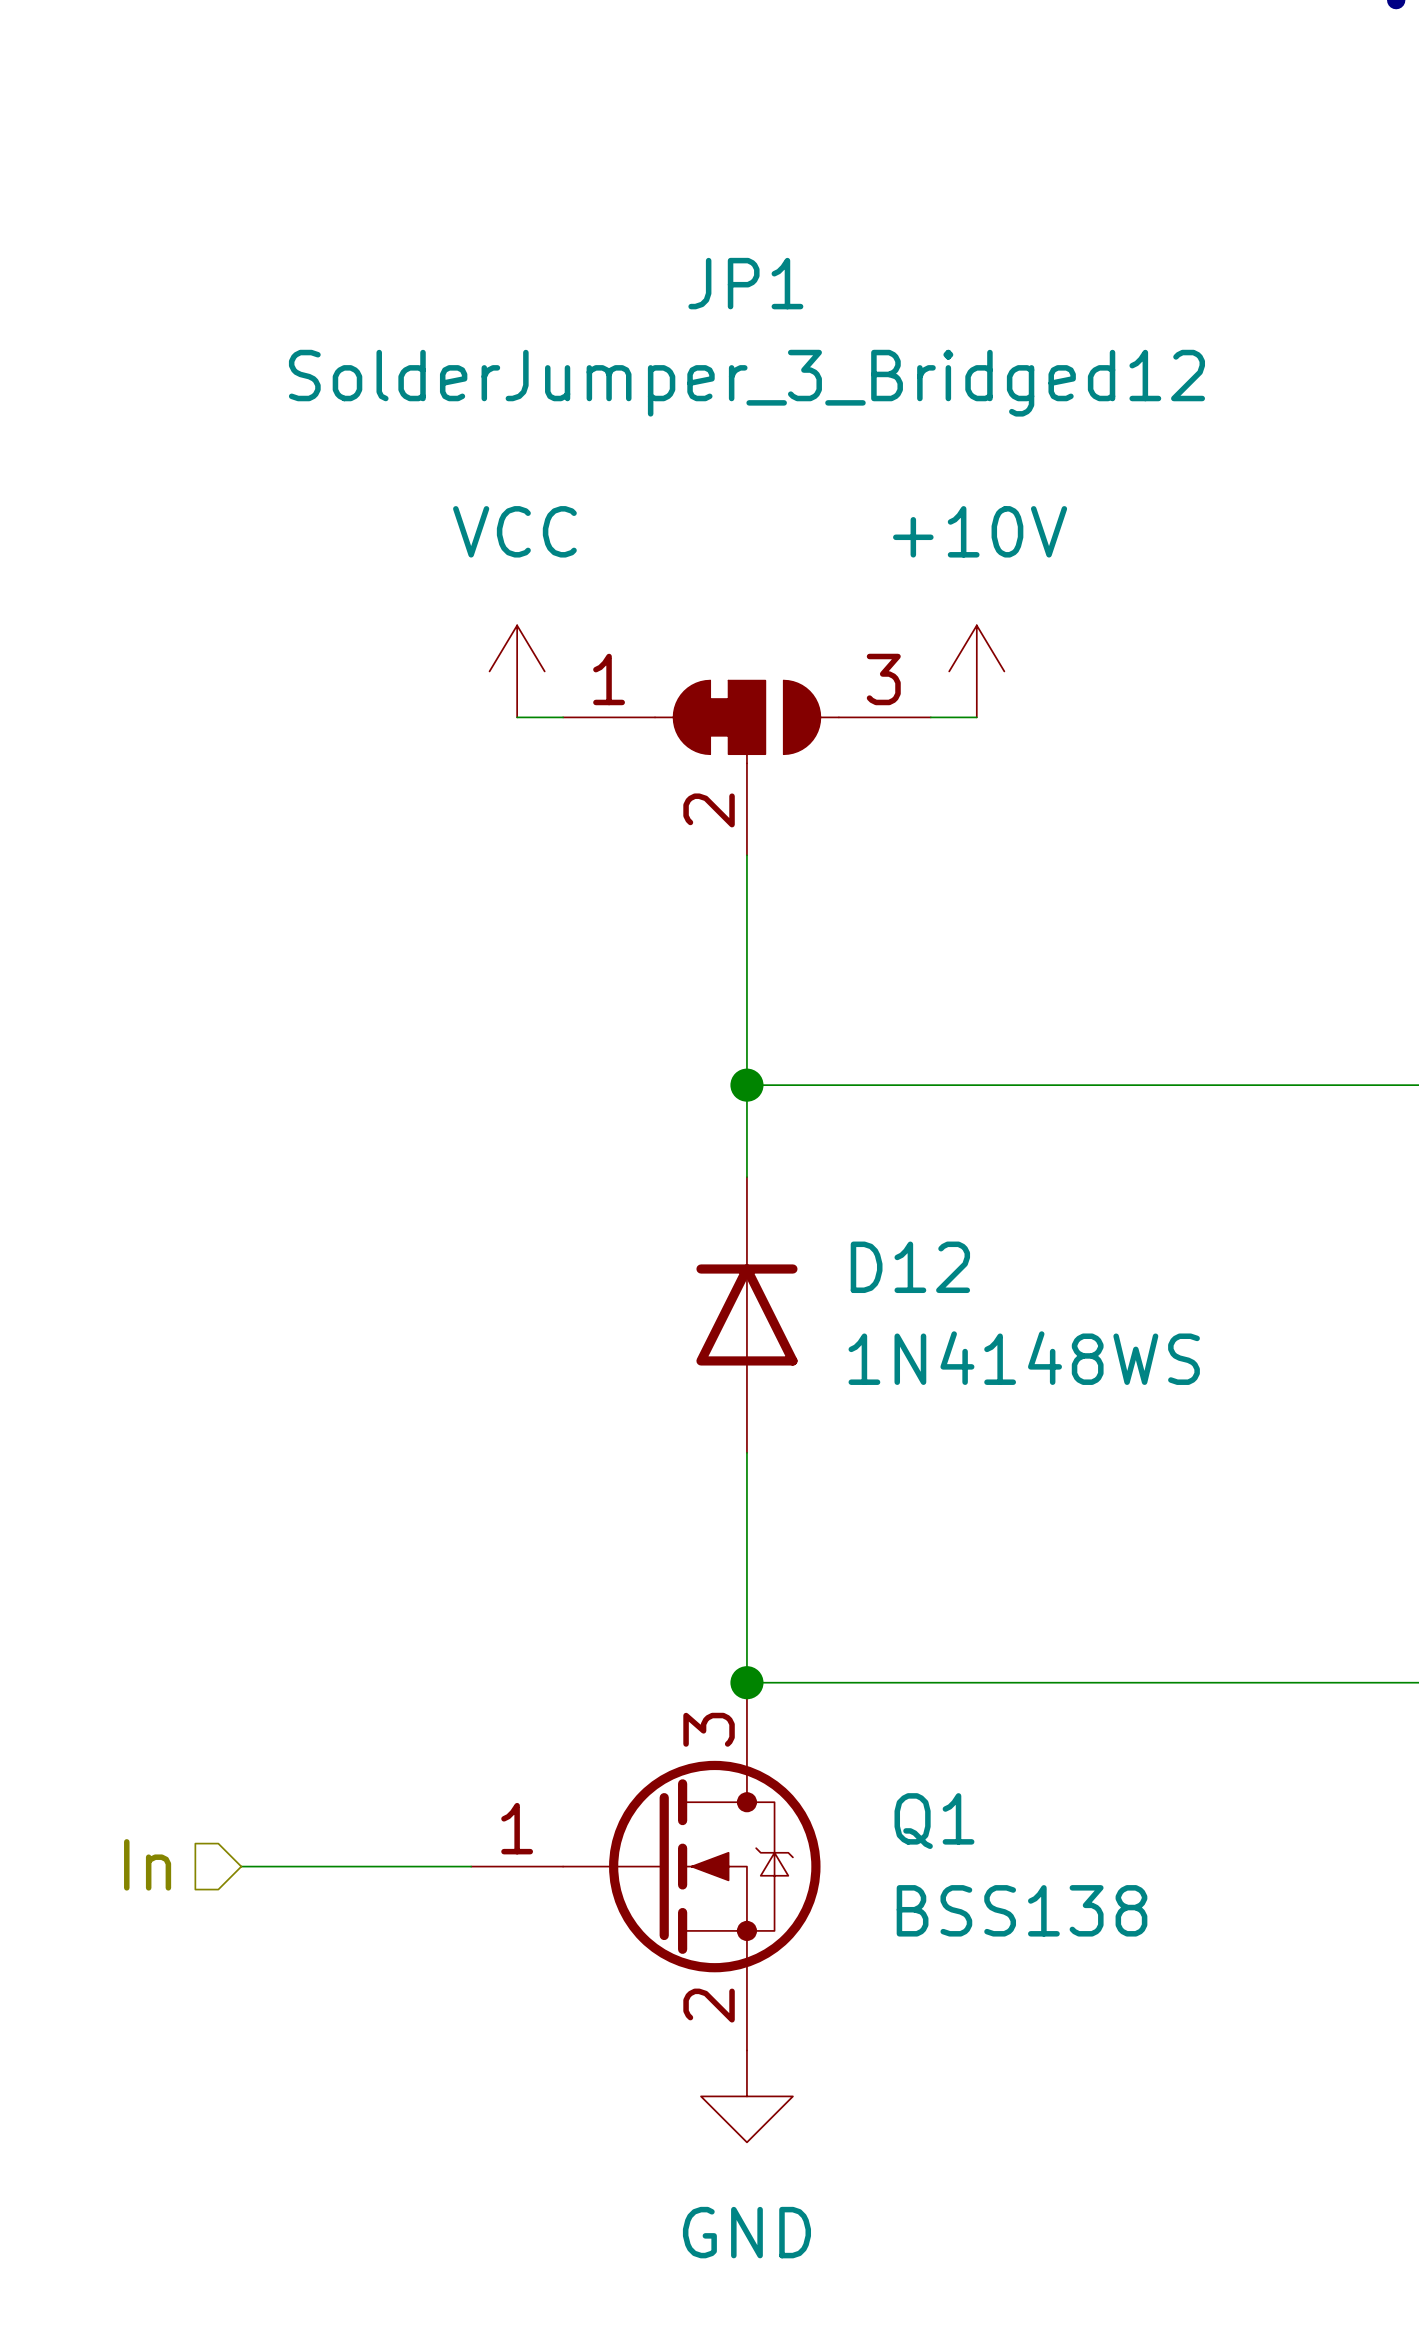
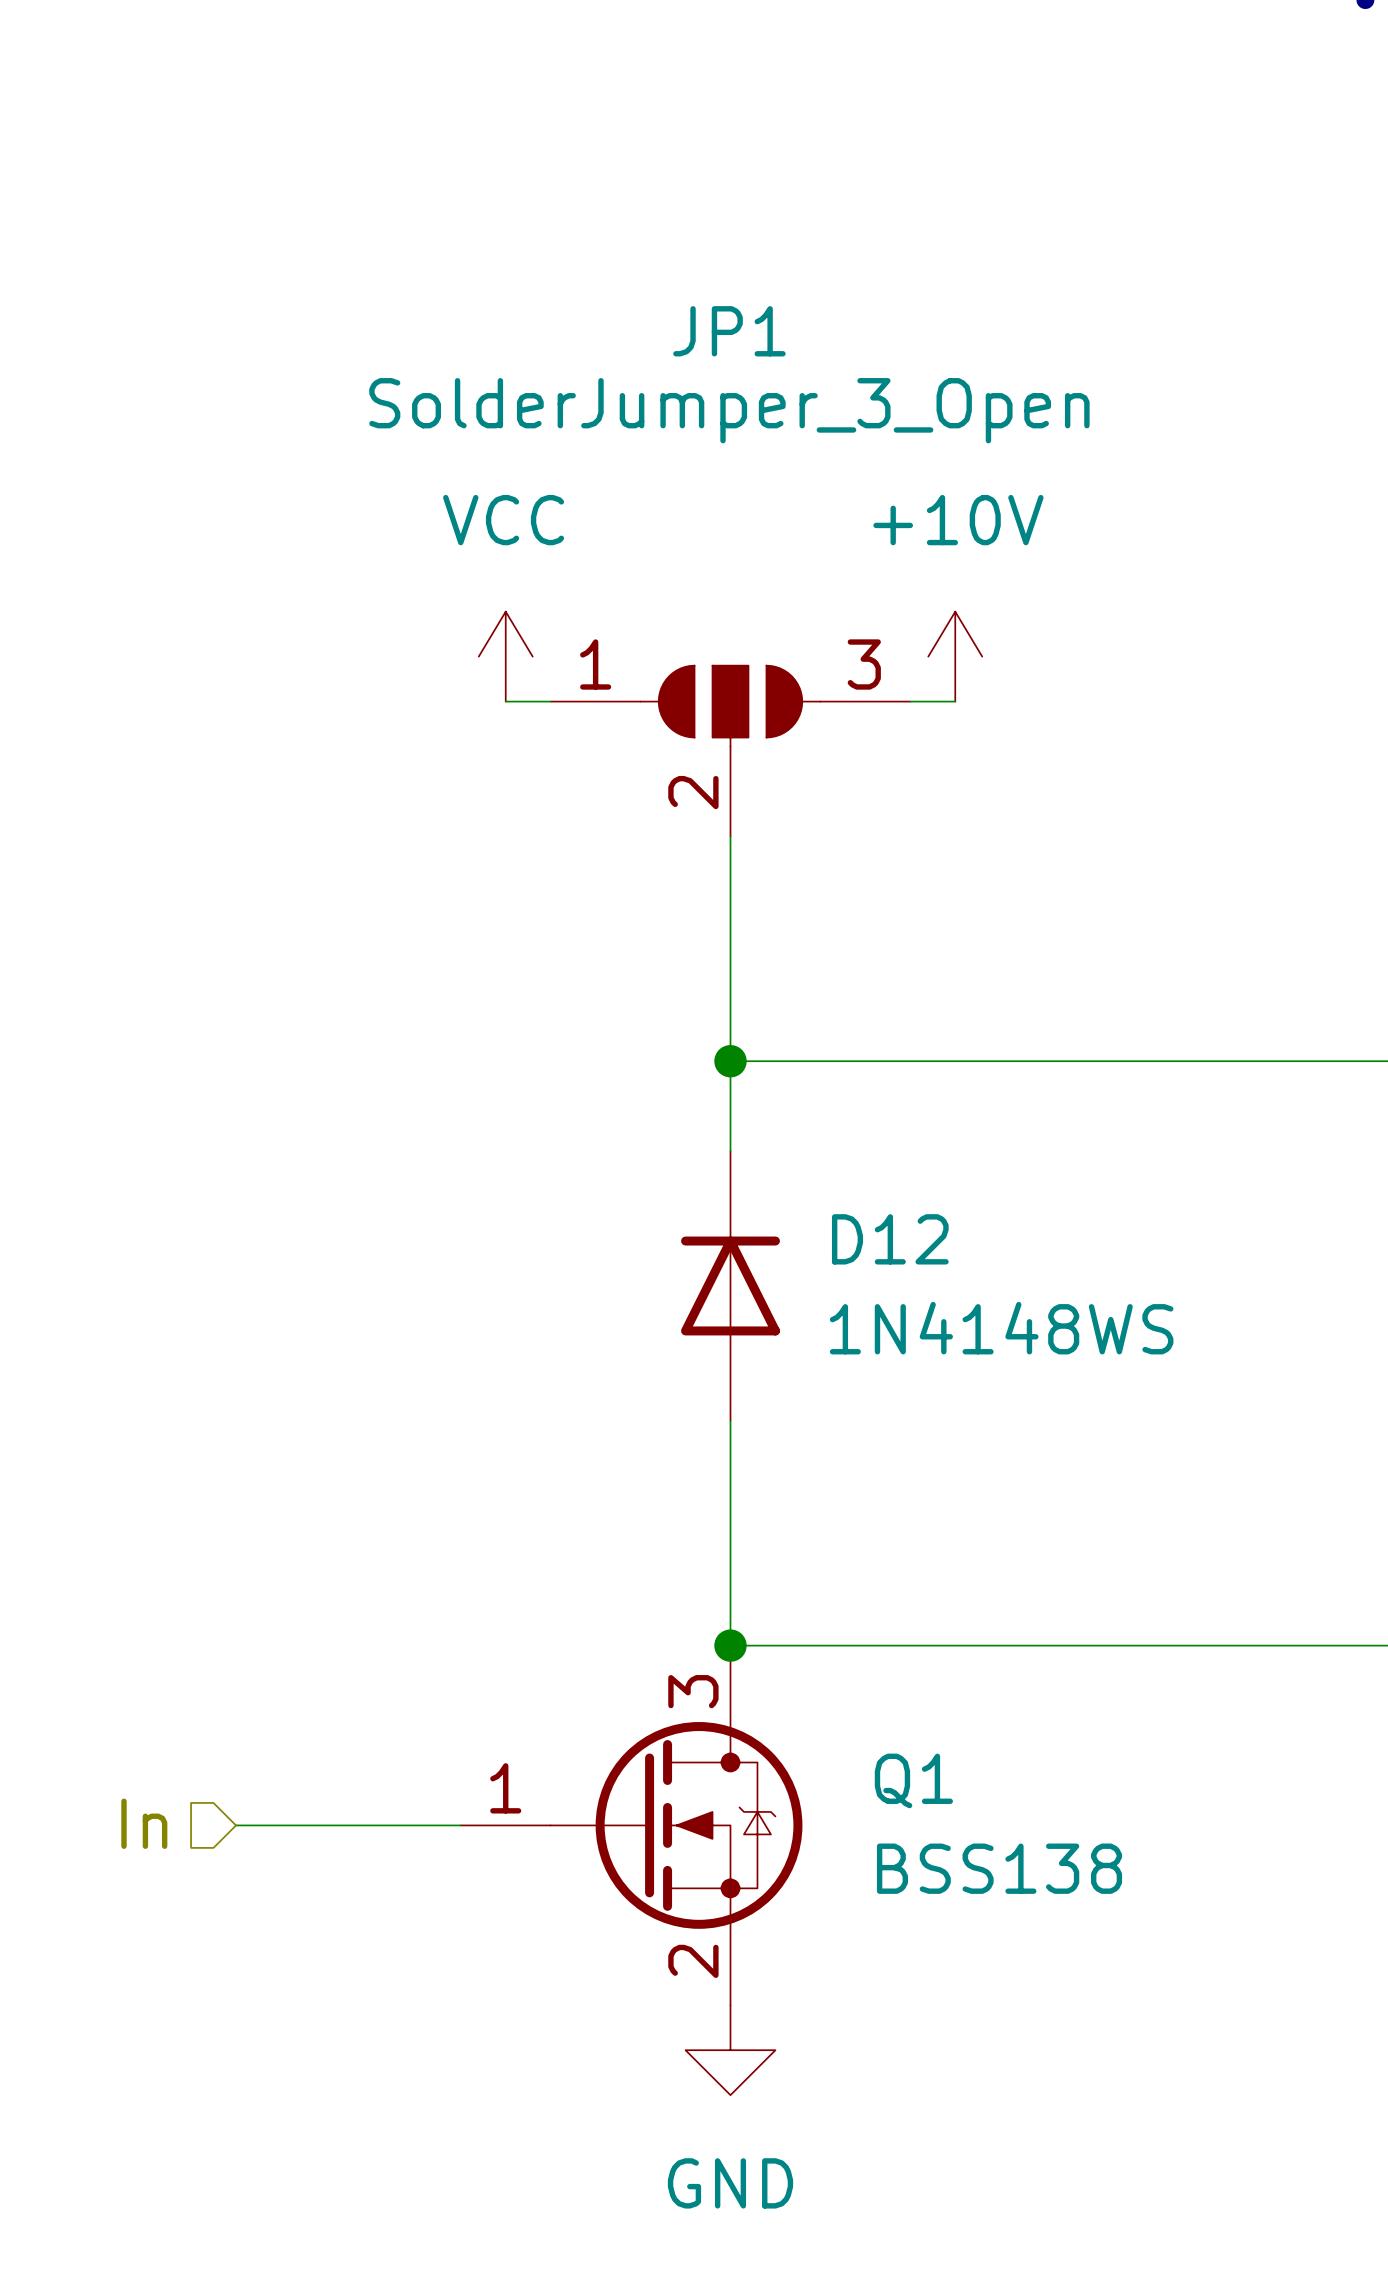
JP1 name position: JP1 (745, 283) -> JP1 (729, 331)
JP1 value: SolderJumper_3_Bridged12 (746, 383) -> SolderJumper_3_Open (729, 410)
JP1 symbol: [563, 680, 931, 856] -> [550, 665, 911, 837]

